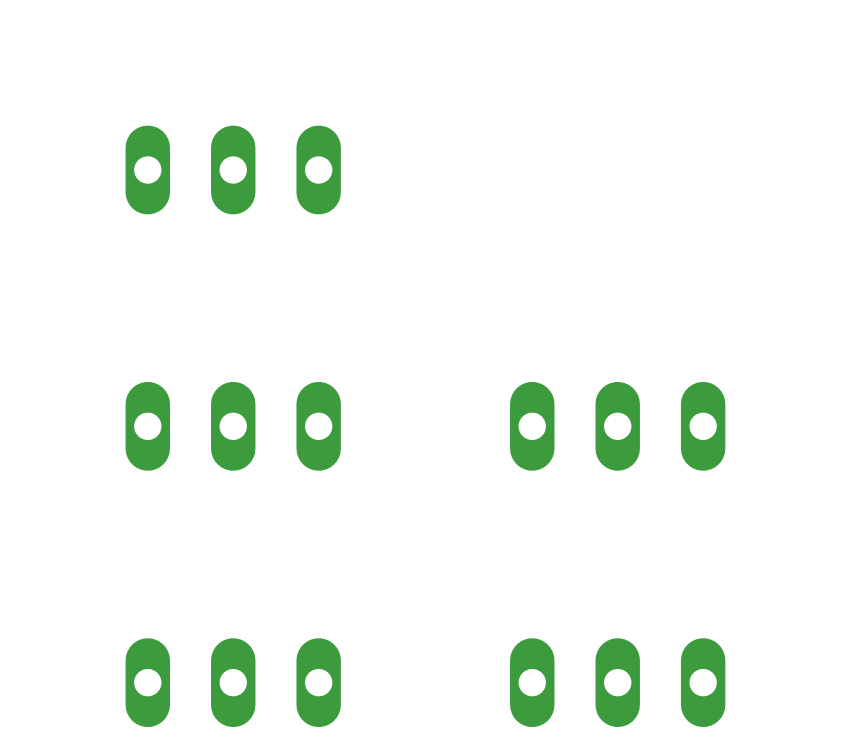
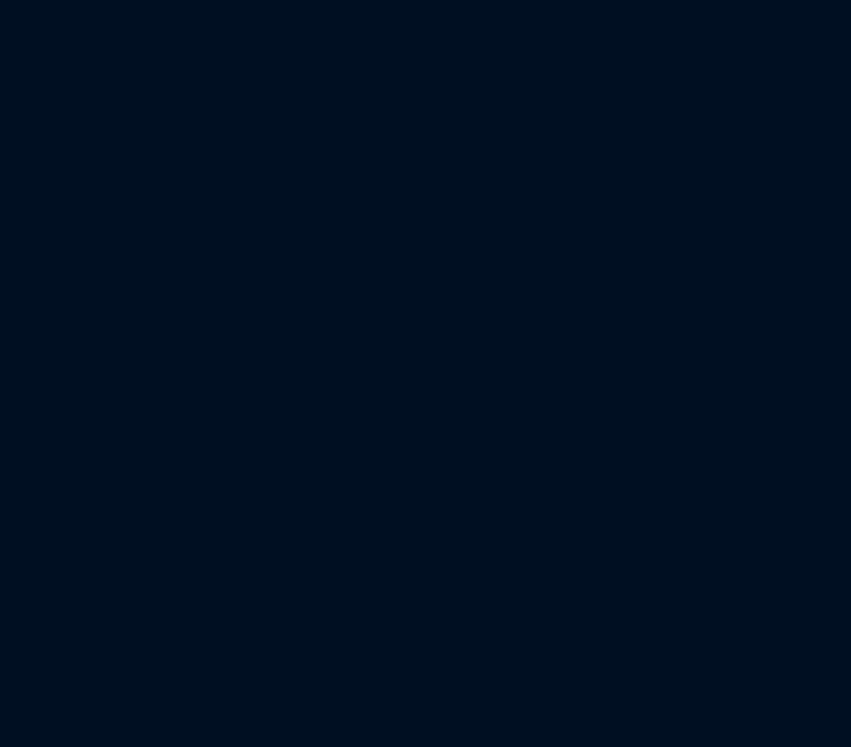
part: (233, 170) -> none
part: (233, 426) -> none
part: (617, 426) -> none
part: (233, 682) -> none
part: (617, 682) -> none

